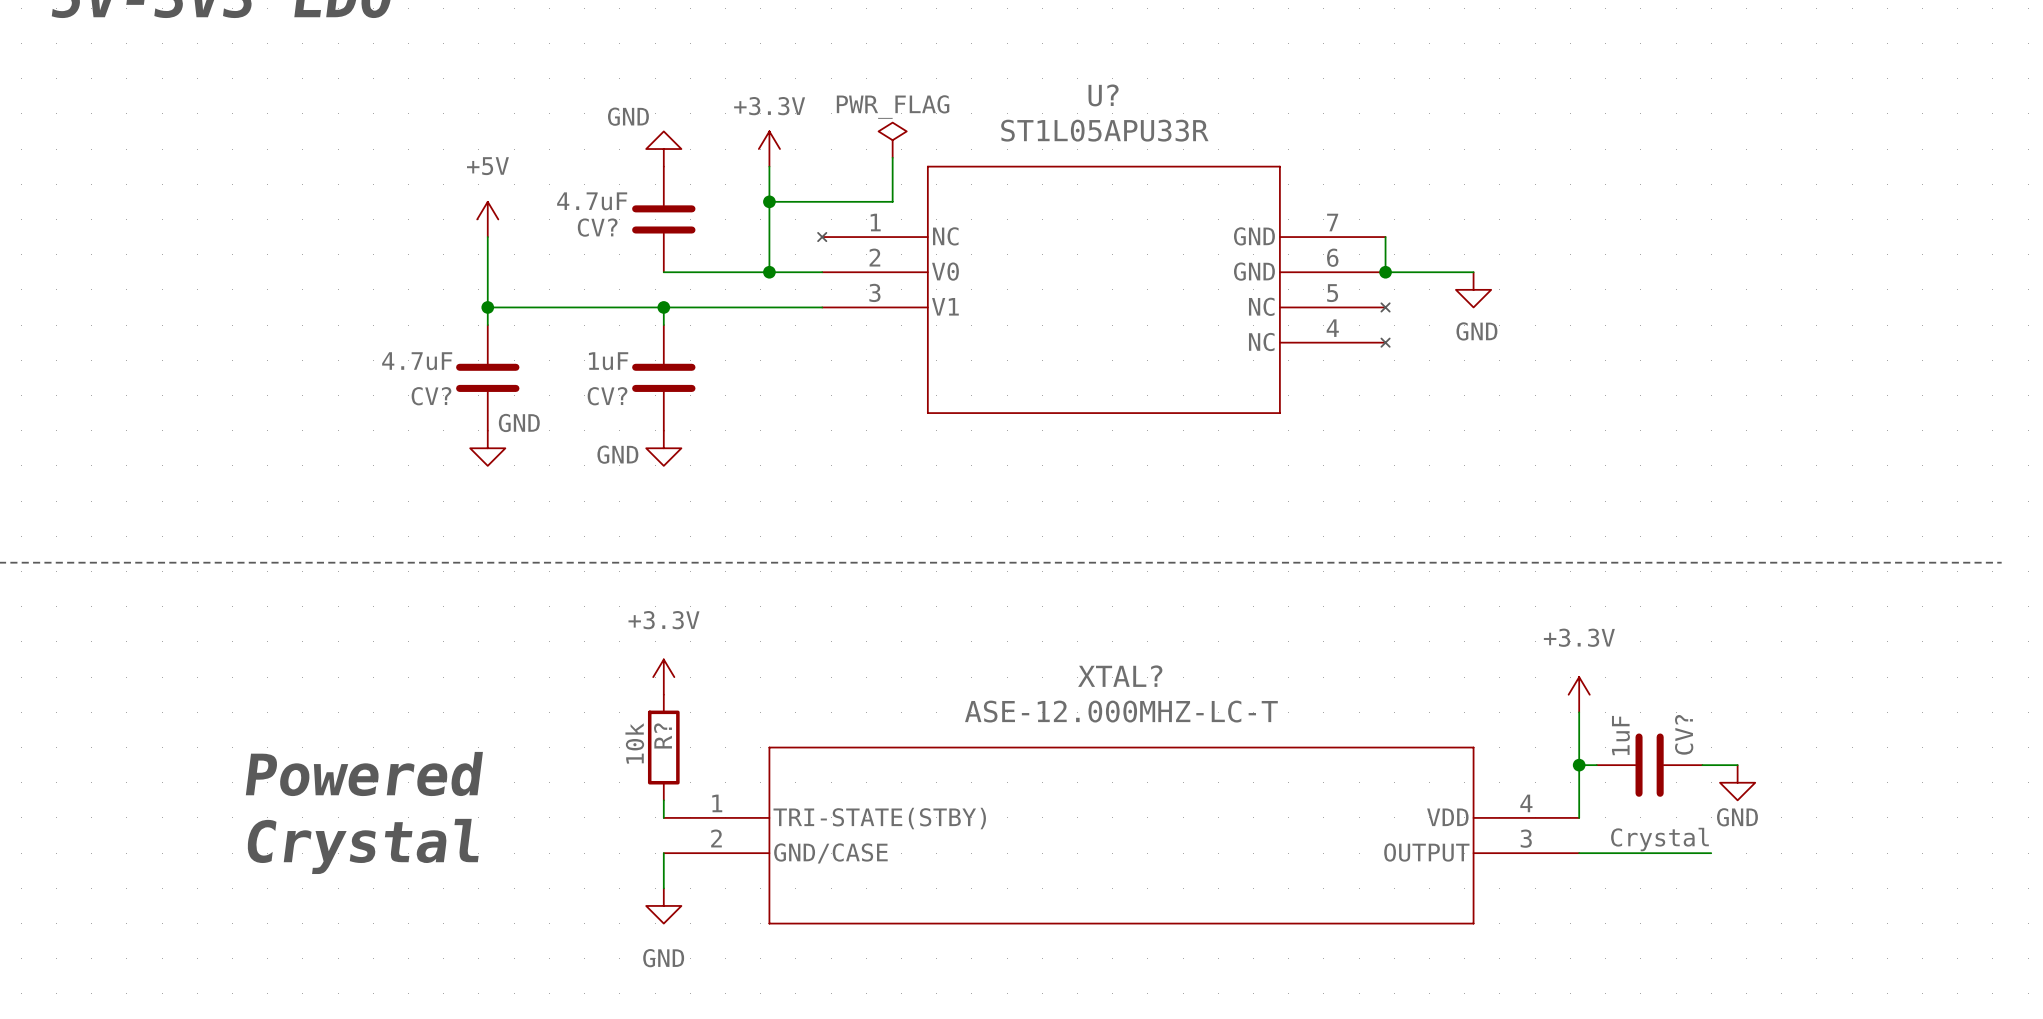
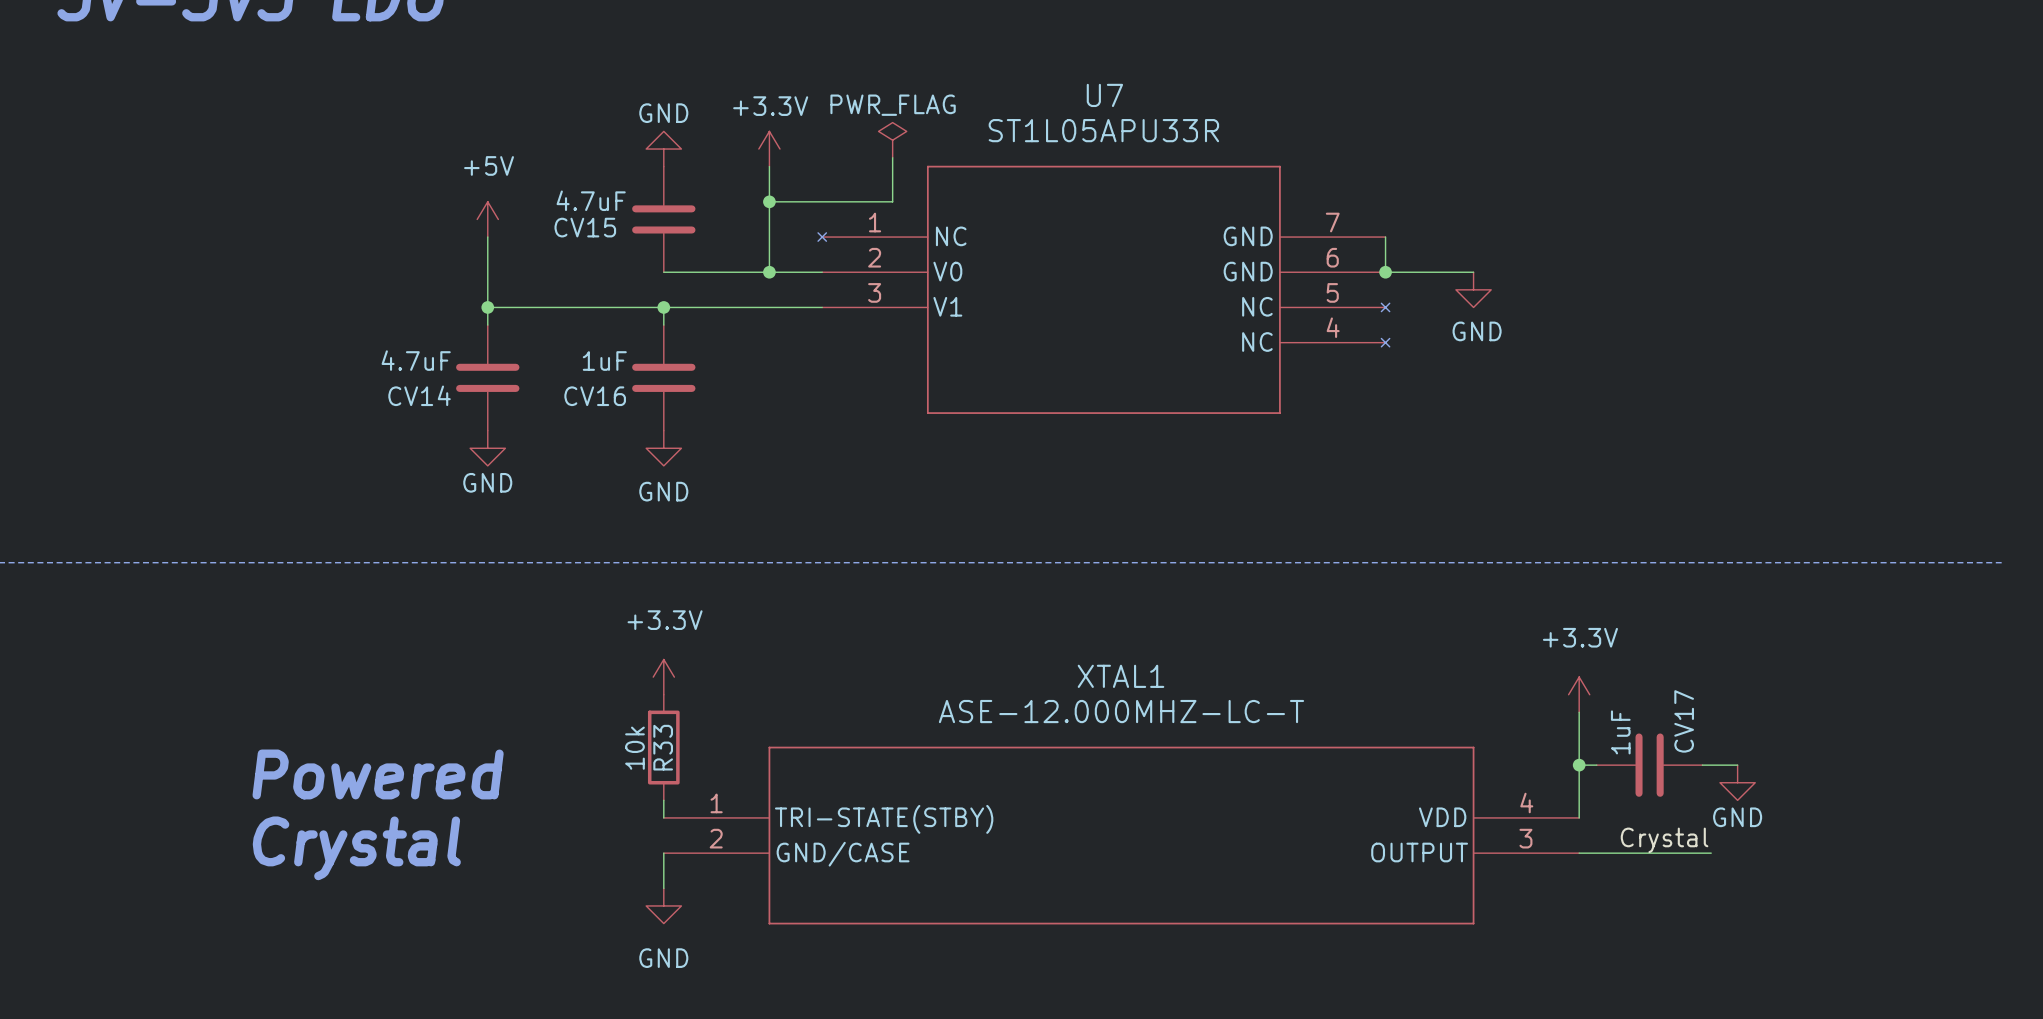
U? name: U? (1103, 95) -> U7 (1104, 95)
power symbol text position: GND (628, 116) -> GND (663, 113)
CV? name: CV? (597, 227) -> CV15 (585, 227)
CV? name: CV? (431, 396) -> CV14 (419, 395)
CV? name: CV? (607, 396) -> CV16 (595, 396)
power symbol text position: GND (519, 422) -> GND (487, 482)
power symbol text position: GND (617, 454) -> GND (663, 491)
XTAL? name: XTAL? (1120, 676) -> XTAL1 (1120, 676)
CV? name: CV? (1684, 734) -> CV17 (1684, 721)
R? name: R? (662, 735) -> R33 (663, 747)

